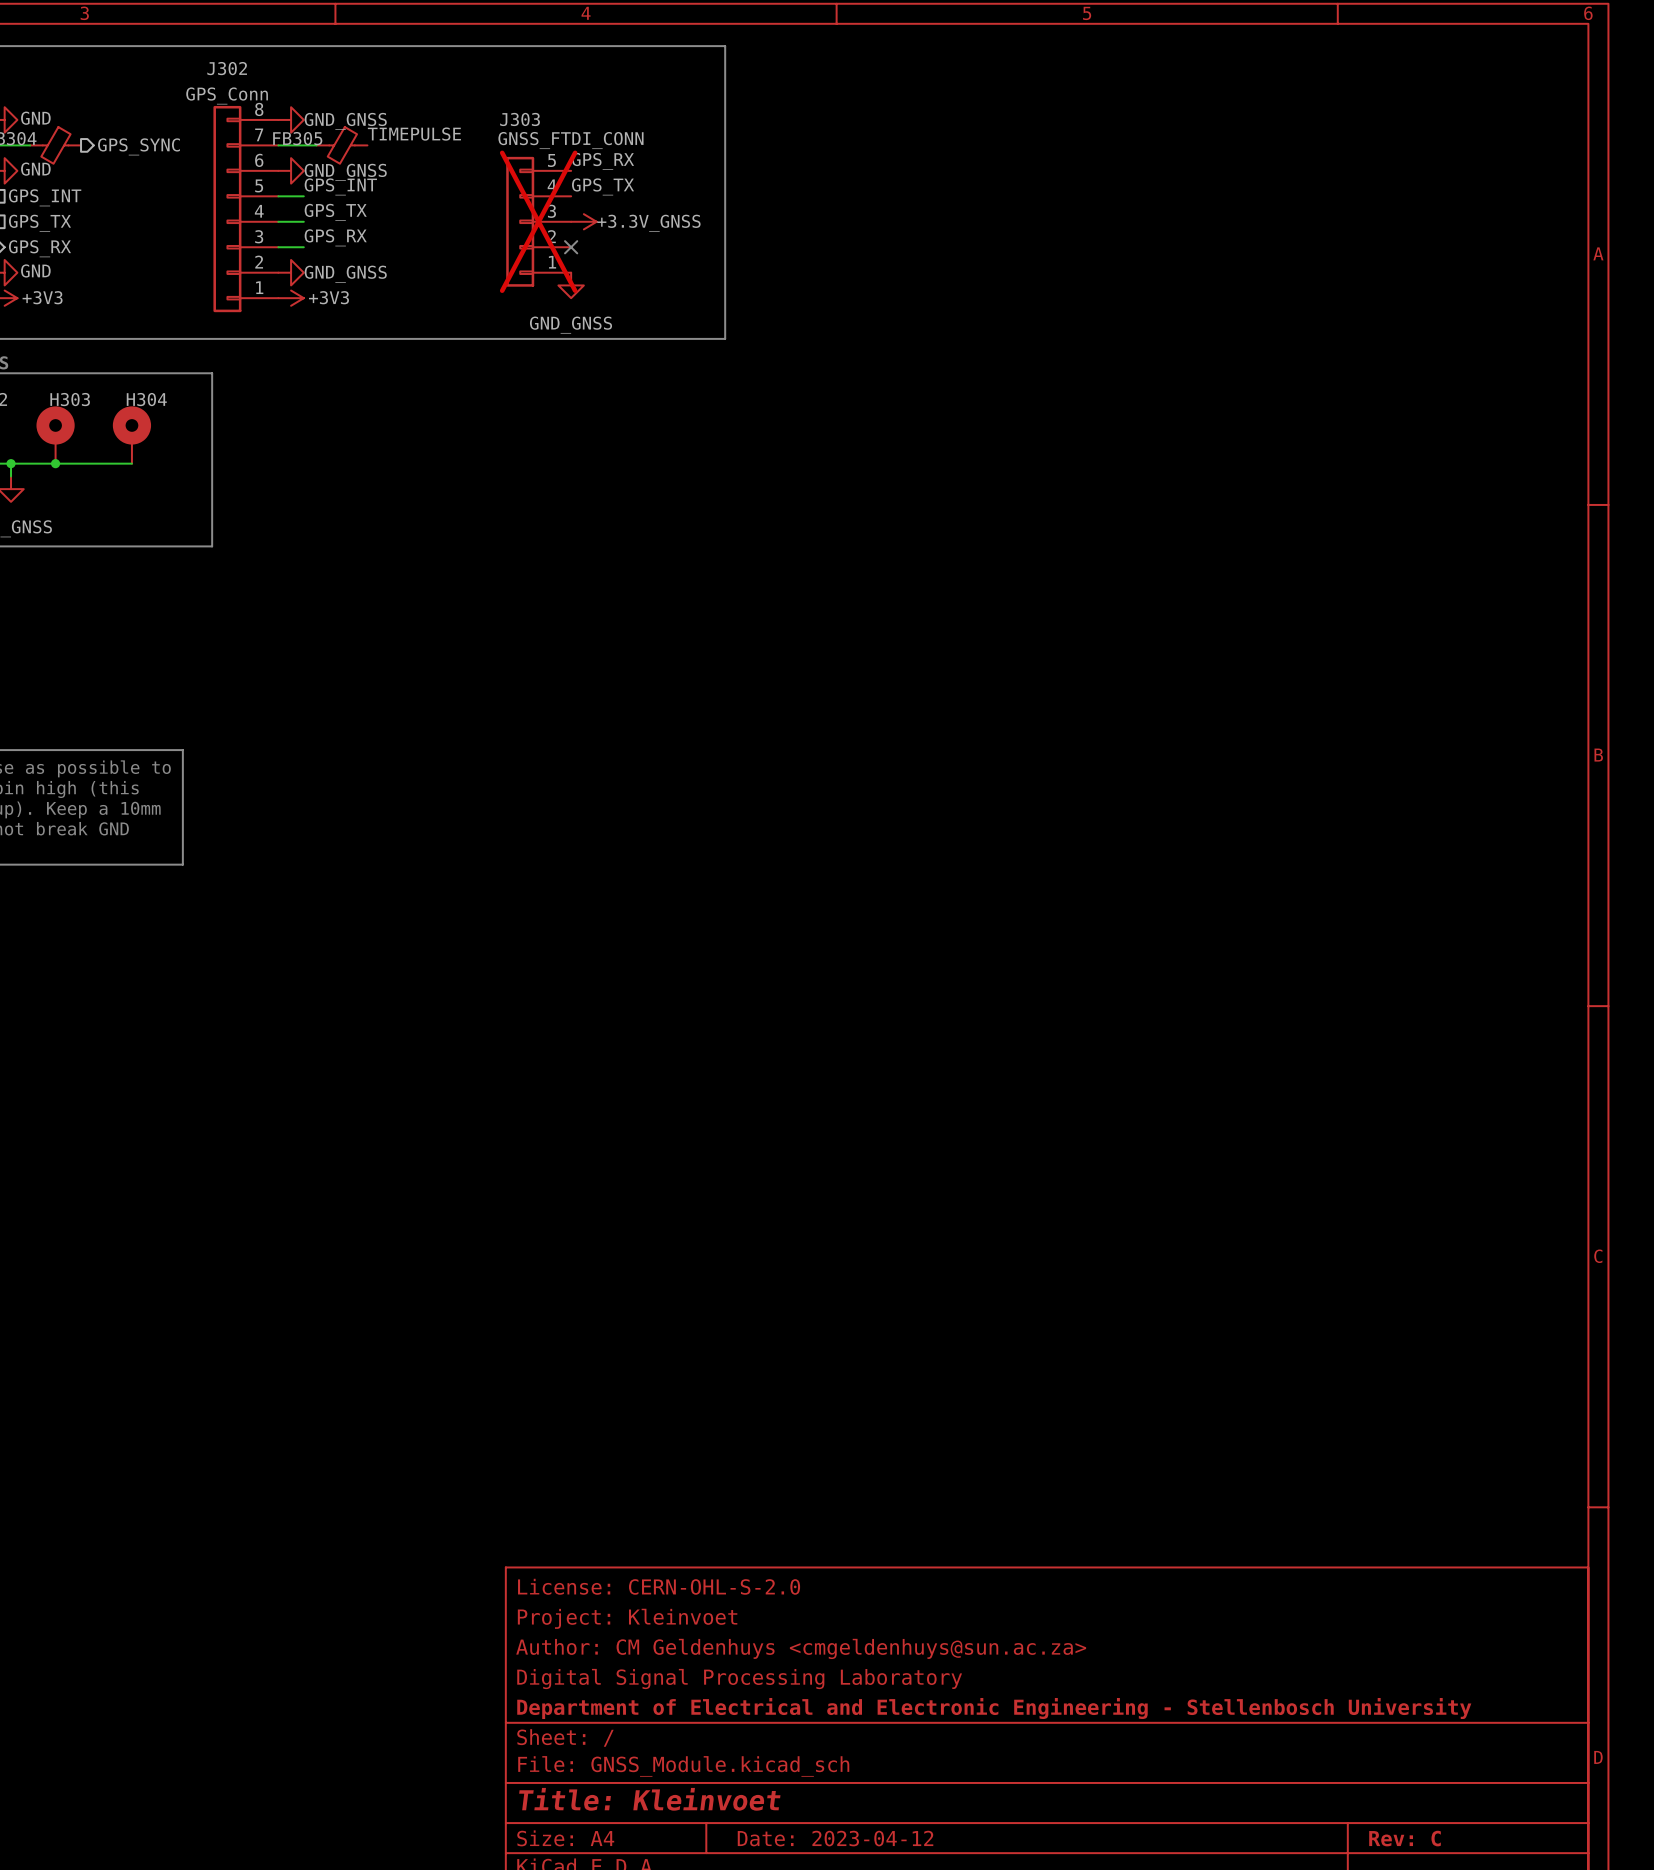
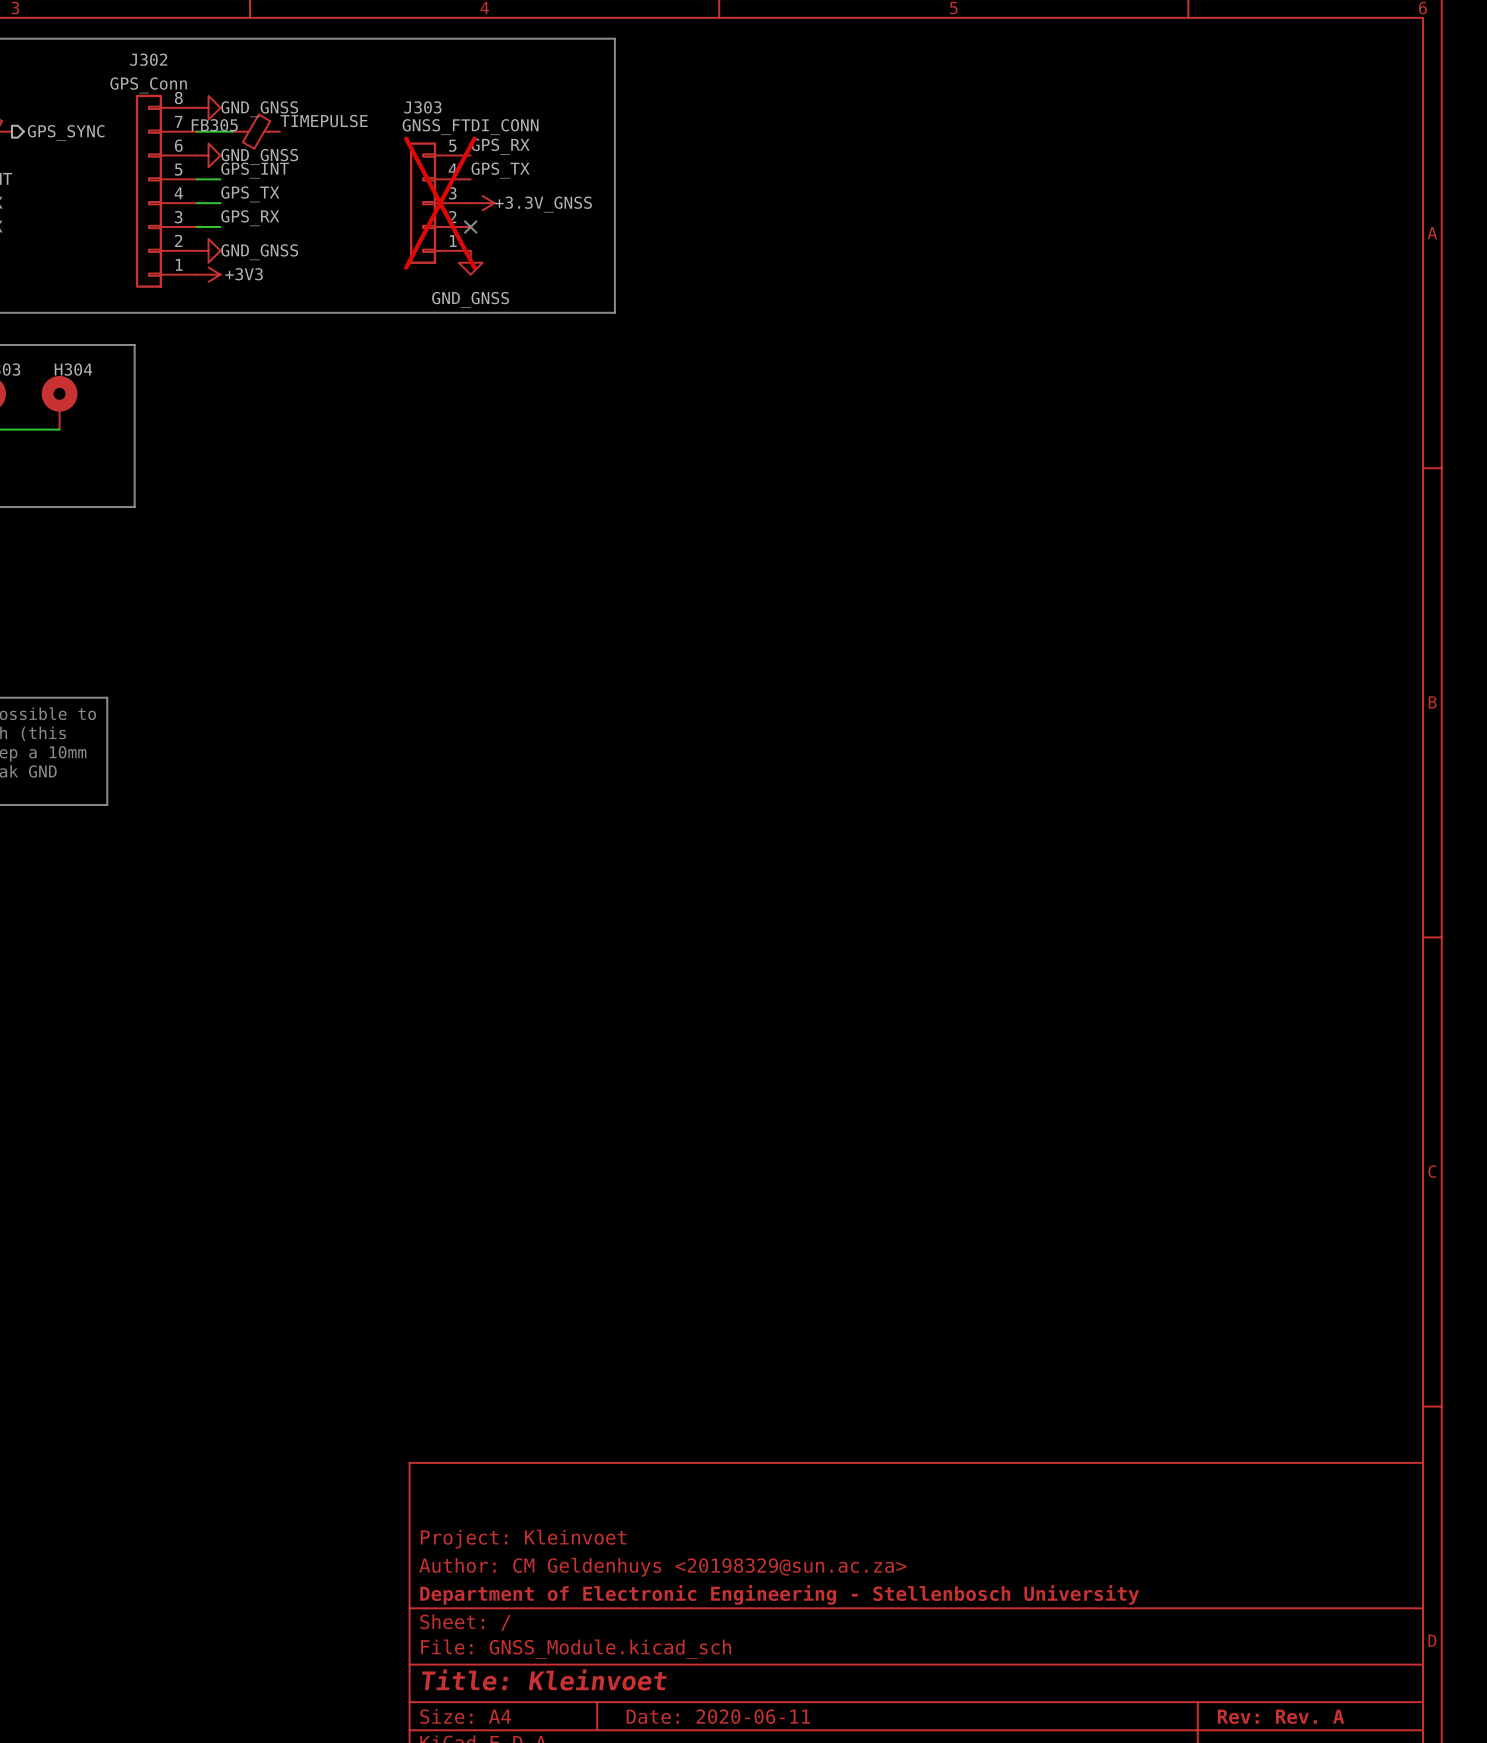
title block: License: CERN-OHL-S-2.0 (659, 1586) -> none
title block: Project: Kleinvoet (627, 1618) -> none
title block: Author: CM Geldenhuys <cmgeldenhuys@sun.ac.za> (801, 1648) -> Project: Kleinvoet (523, 1539)
title block: Digital Signal Processing Laboratory (739, 1679) -> Author: CM Geldenhuys <20198329@sun.ac.za> (662, 1567)
title block: Department of Electrical and Electronic Engineering - Stellenbosch University (994, 1708) -> Department of Electronic Engineering - Stellenbosch University (779, 1594)
title block: Date: 2023-04-12 (835, 1838) -> Date: 2020-06-11 (718, 1716)
title block: Rev: C (1405, 1838) -> Rev: Rev. A (1280, 1716)

